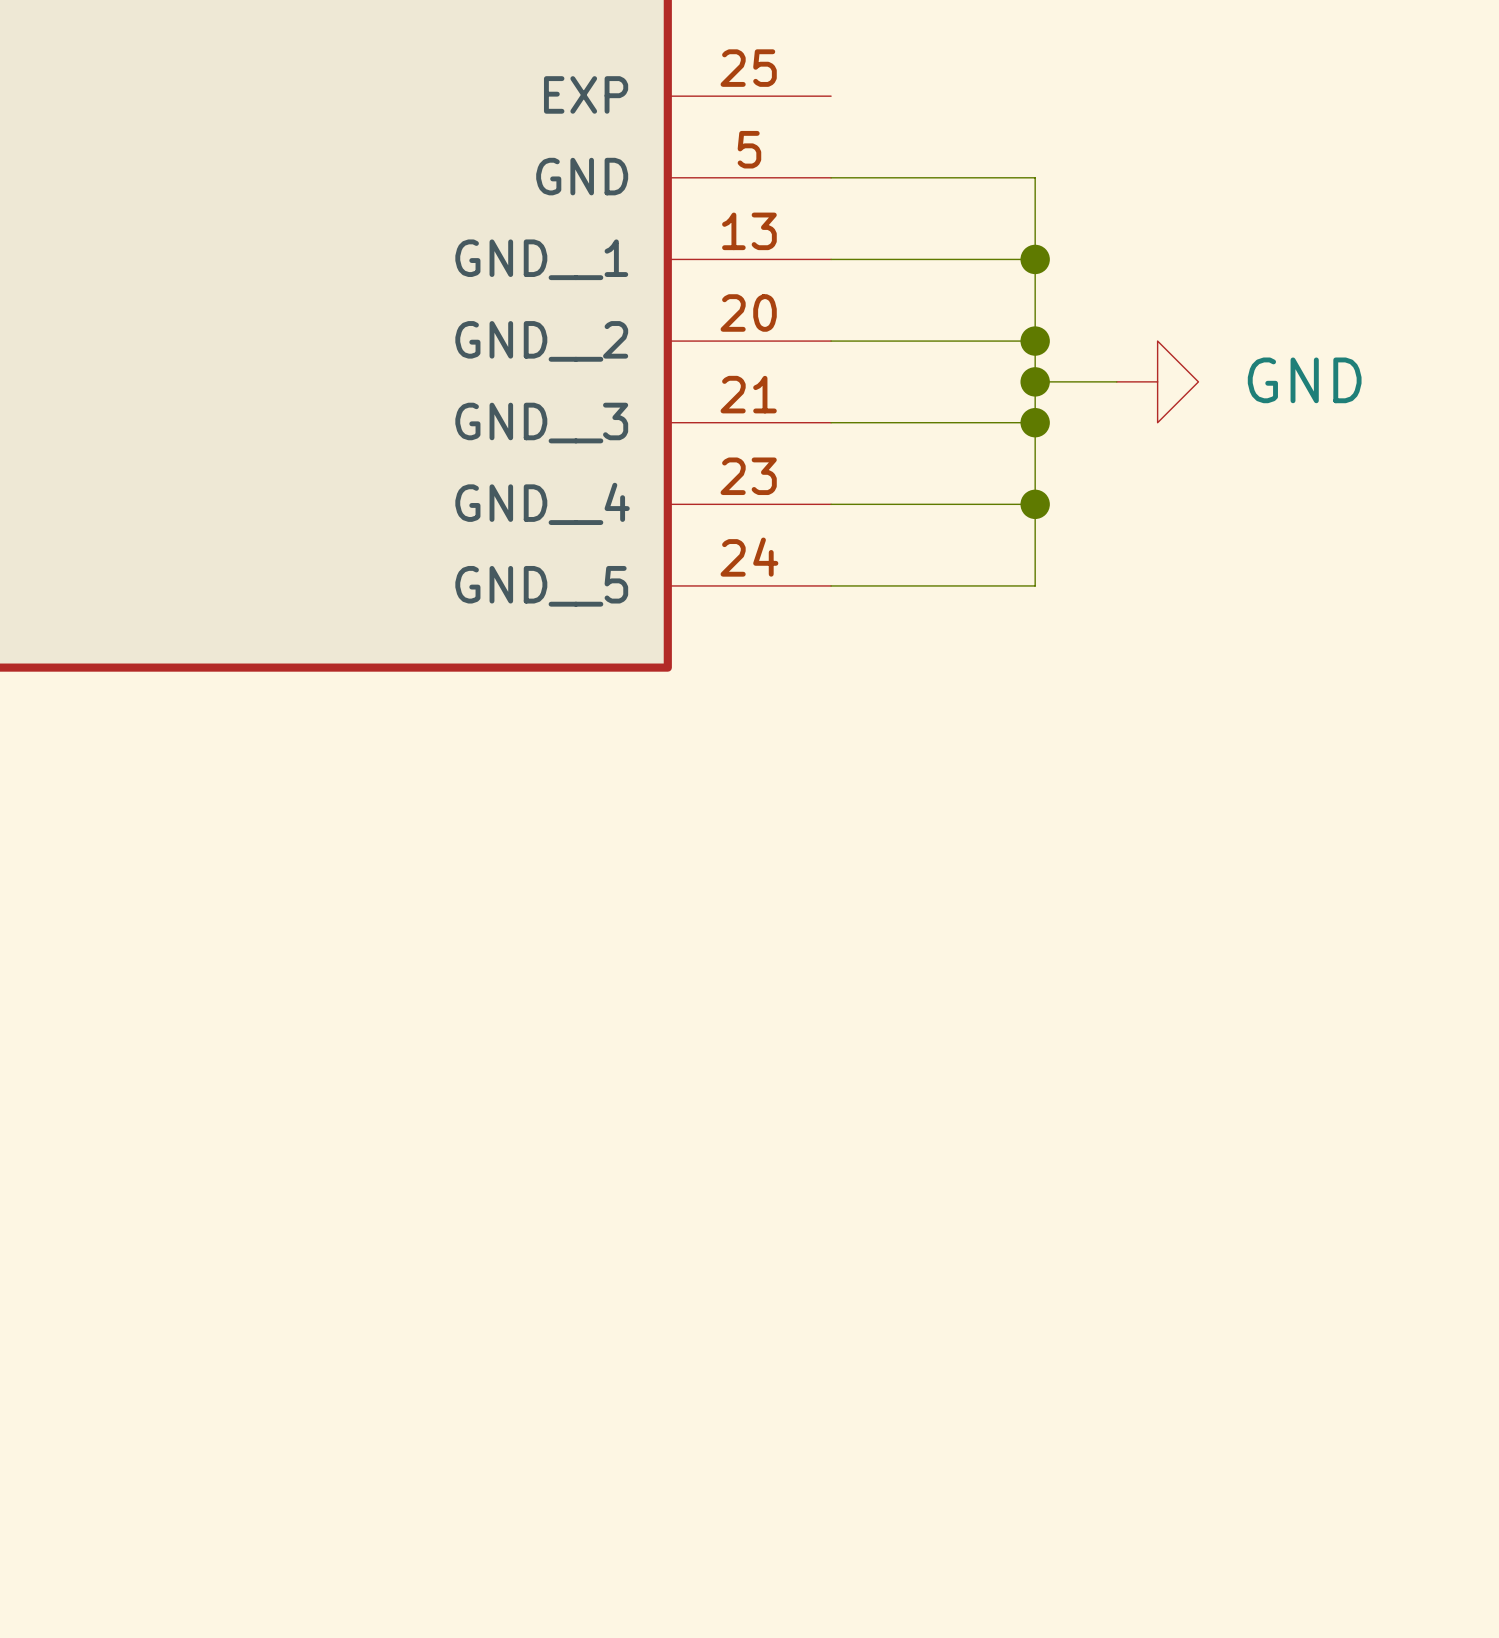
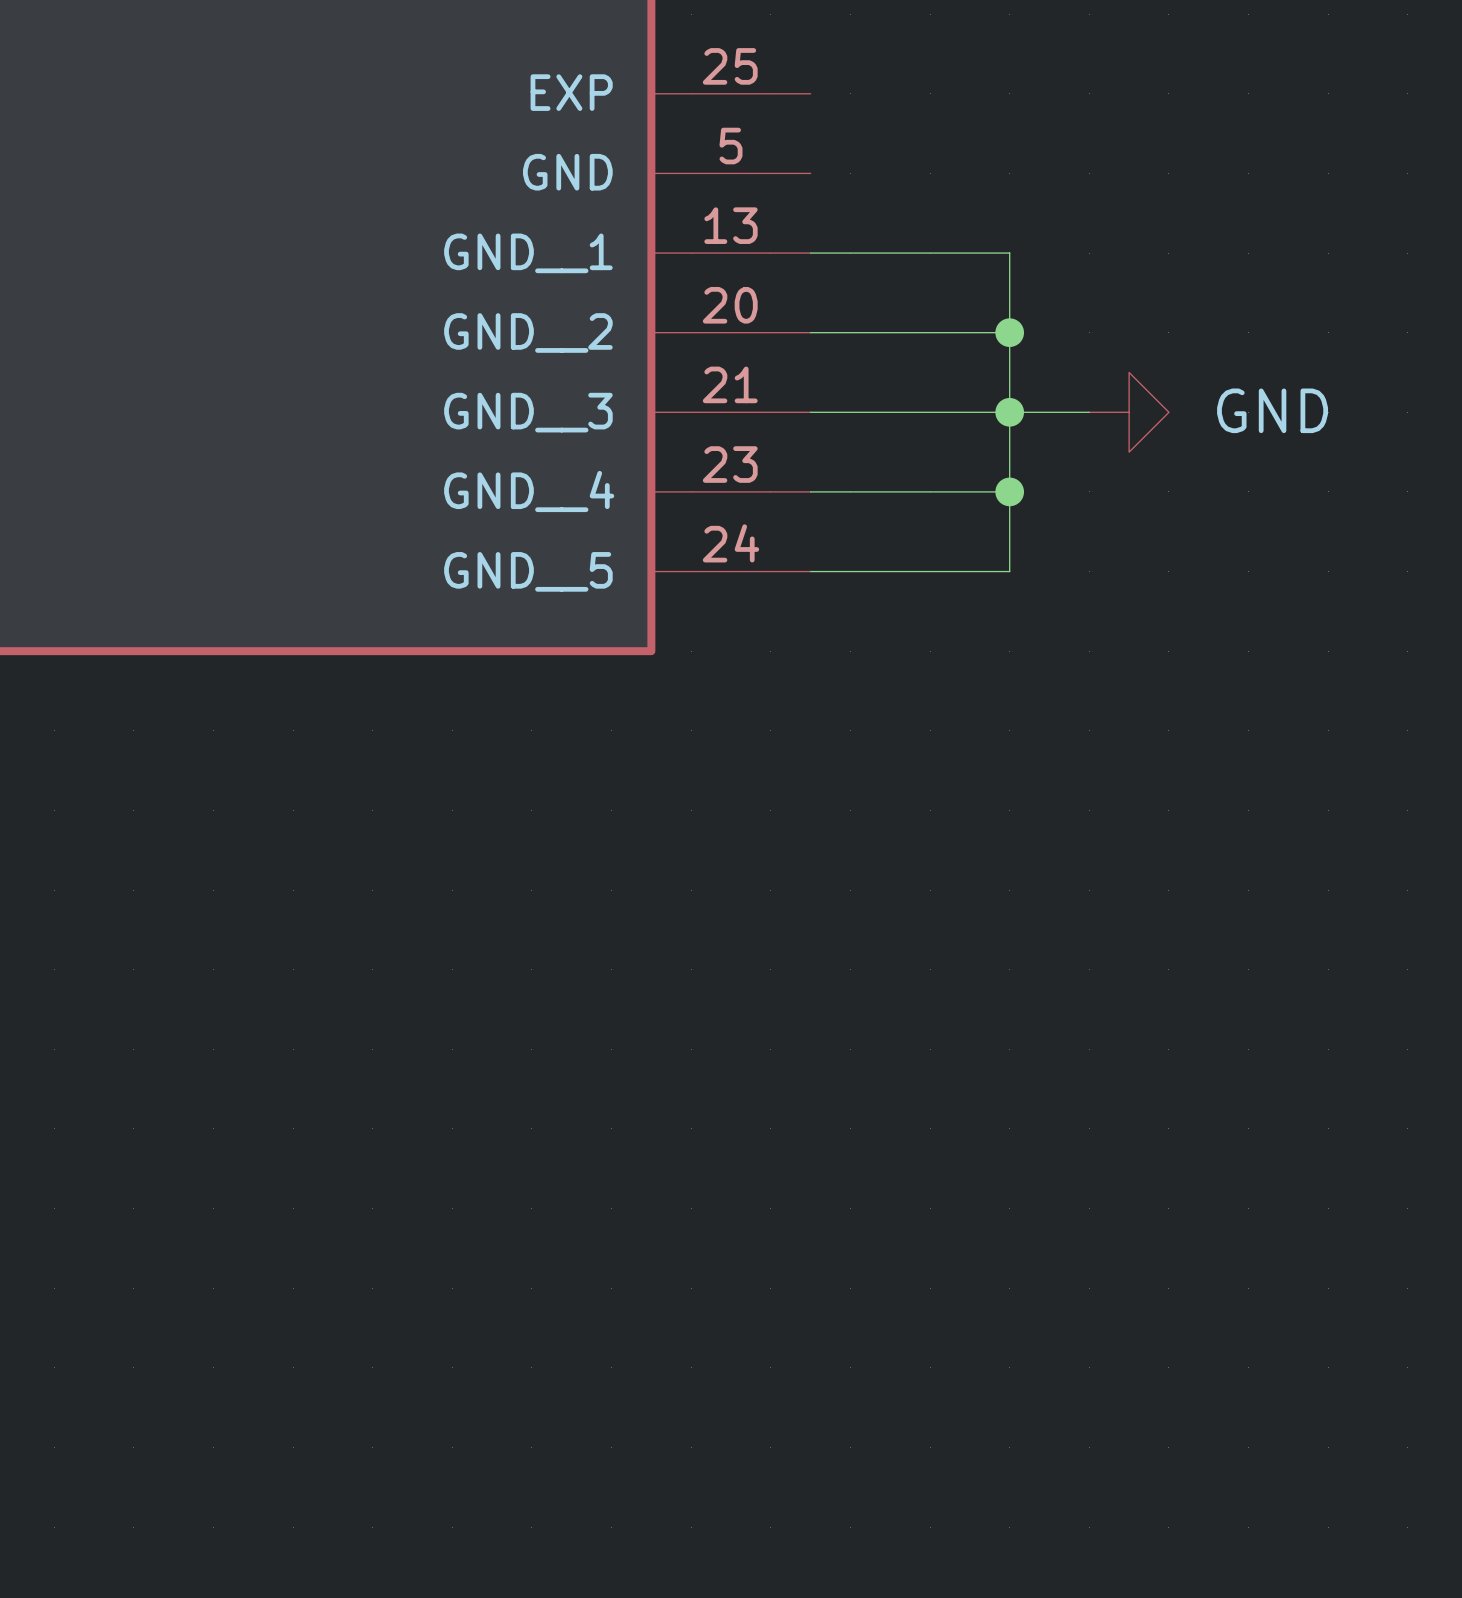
wire: (831, 177) (1035, 177) (1035, 259) -> none
junction: (1035, 259) -> none
wire: (1035, 381) (1116, 381) -> (1009, 412) (1089, 412)
junction: (1035, 381) -> none
power symbol position: GND (1157, 381) -> GND (1129, 412)

